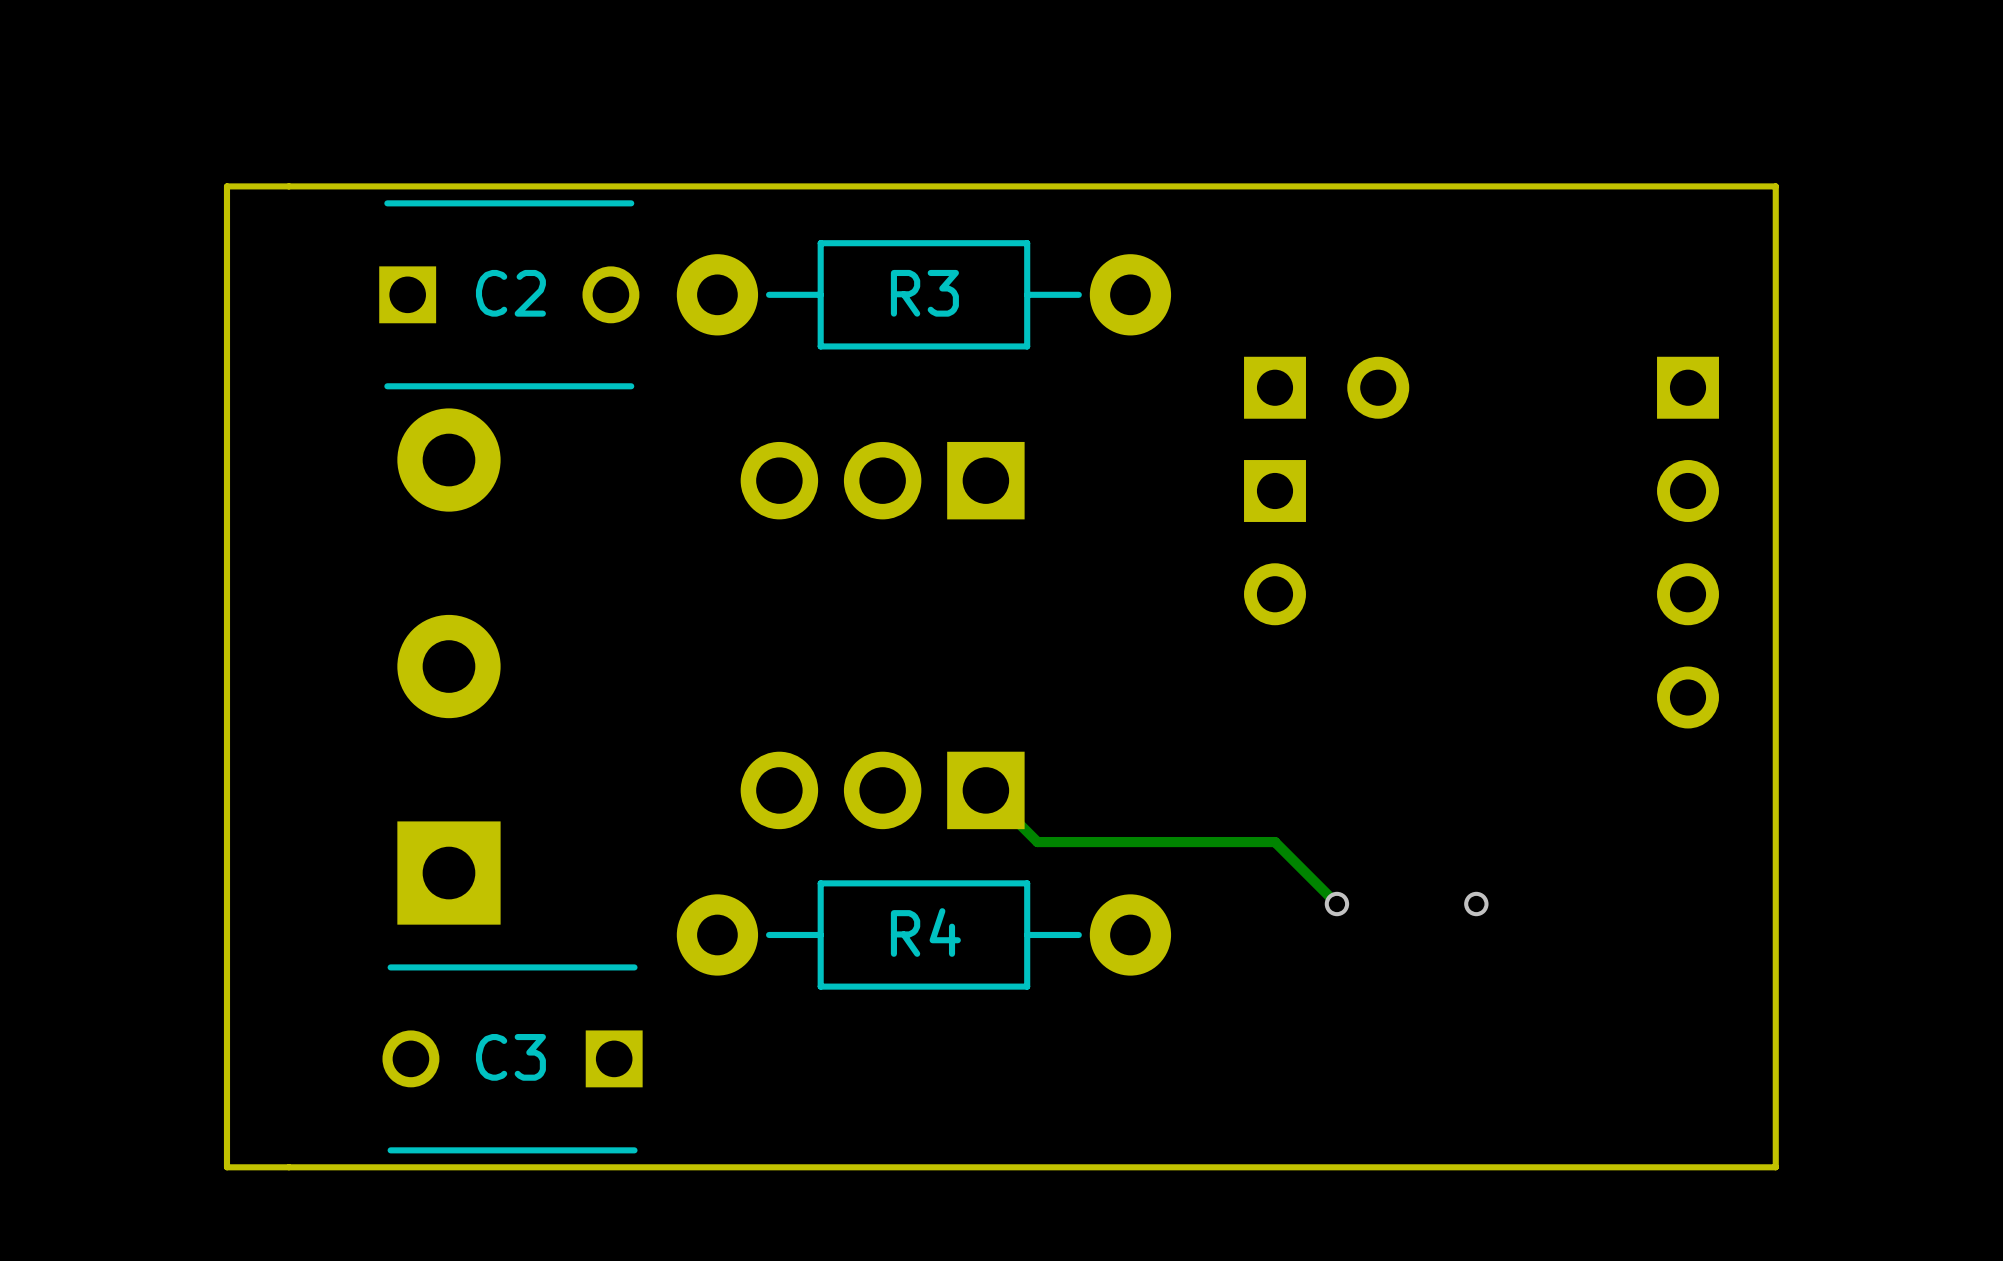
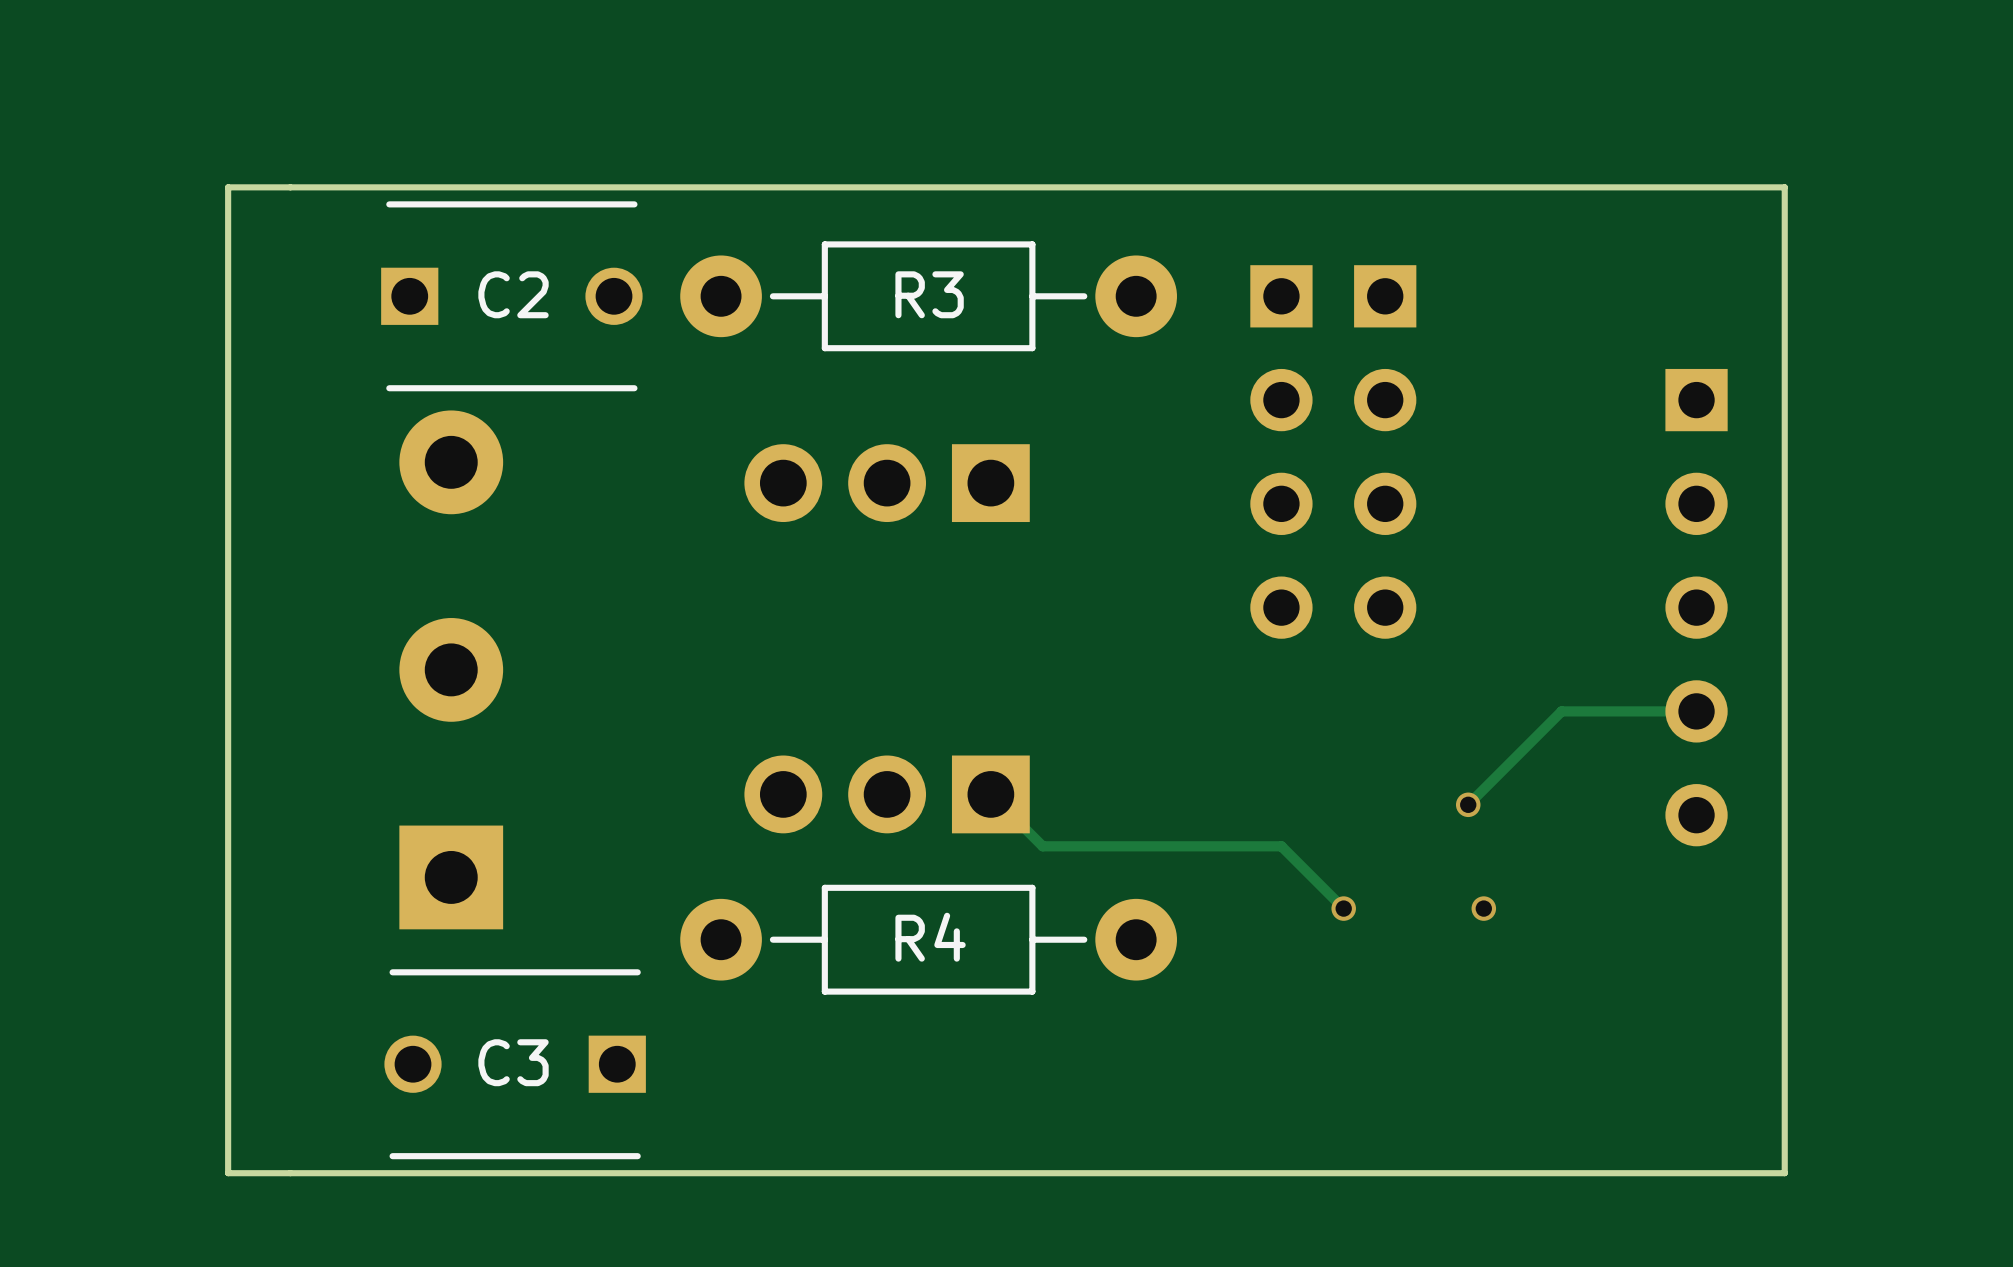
part: (1326, 387) -> none
part: none -> (1281, 451)
part: none -> (1385, 451)
part: (1275, 542) -> none
part: (1688, 542) -> none
part: none -> (1696, 607)
track: none -> (1696, 711) (1561, 711) (1468, 804)
via: none -> (1468, 804)

